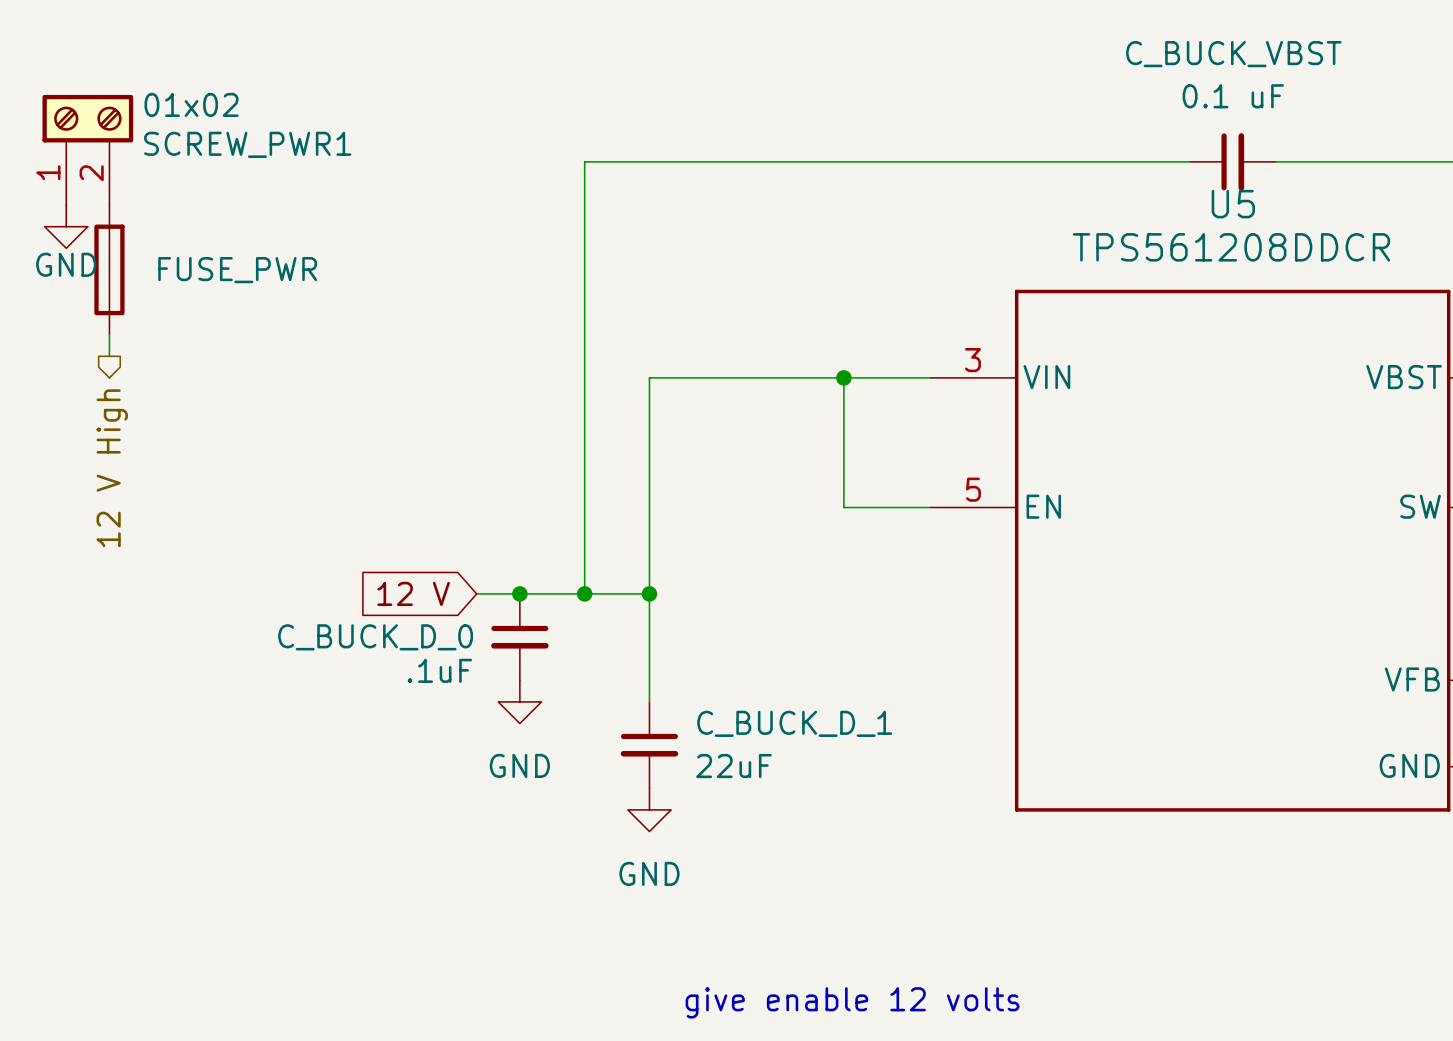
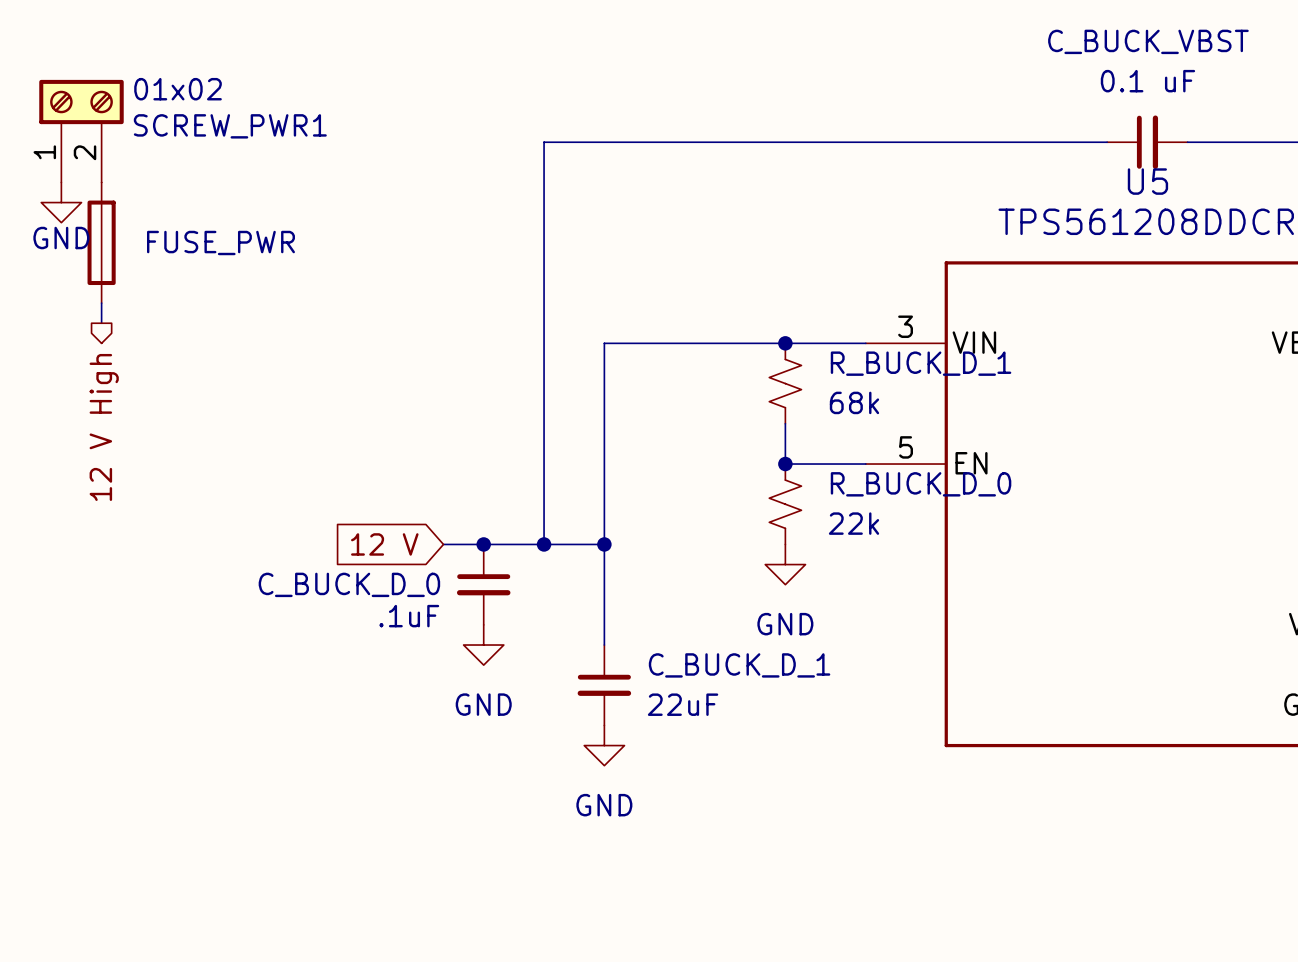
wire: (843, 377) (843, 464) -> none
R_BUCK_D_1: none -> 68k (785, 383)
junction: none -> (785, 464)
R_BUCK_D_0: none -> 22k (785, 504)
power symbol: none -> GND (785, 564)
text: give enable 12 volts (852, 1002) -> none

